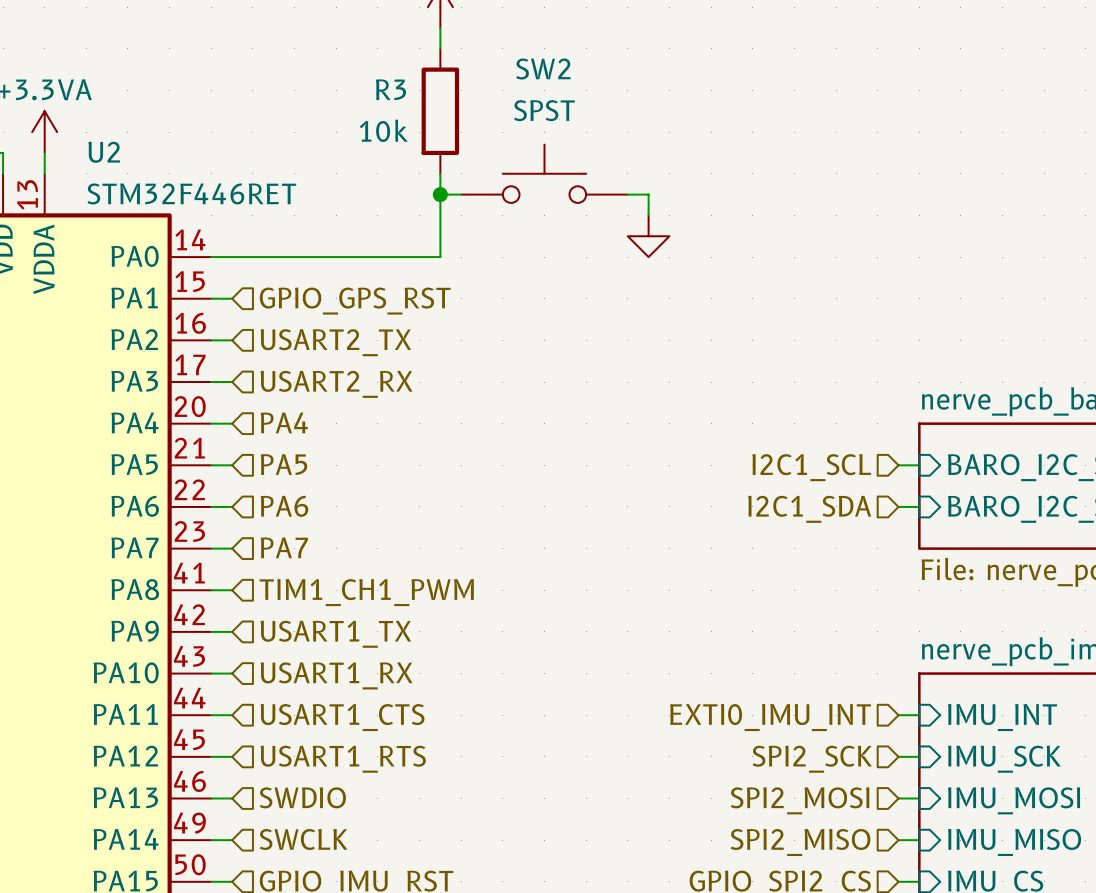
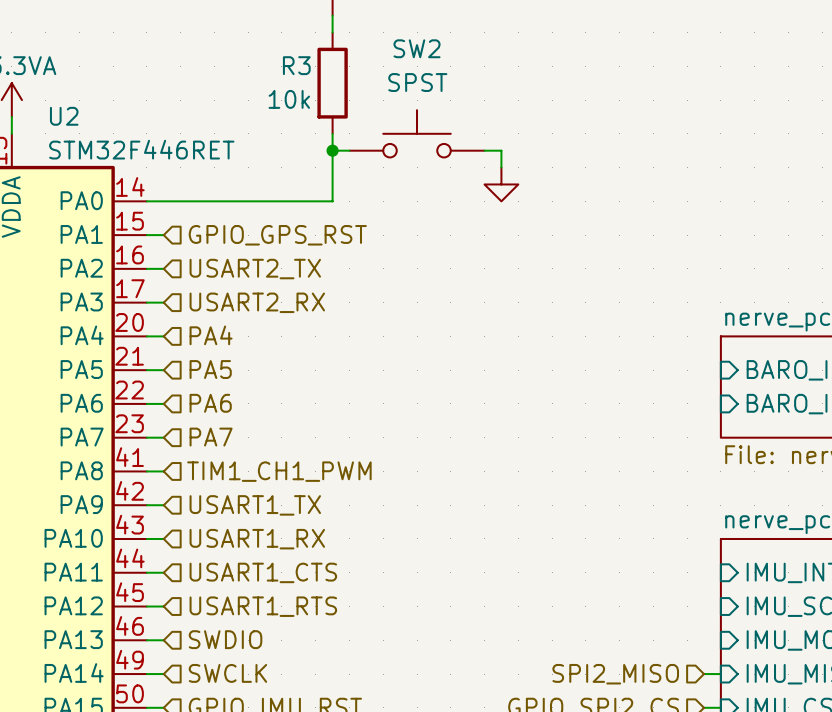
wire: (898, 465) (919, 465) -> none
hierarchical label: I2C1_SCL (811, 467) -> none
wire: (898, 506) (919, 506) -> none
hierarchical label: I2C1_SDA (809, 509) -> none
wire: (898, 715) (919, 715) -> none
hierarchical label: EXTI0_IMU_INT (770, 717) -> none
wire: (898, 756) (919, 756) -> none
hierarchical label: SPI2_SCK (812, 759) -> none
wire: (898, 798) (919, 798) -> none
hierarchical label: SPI2_MOSI (800, 800) -> none

